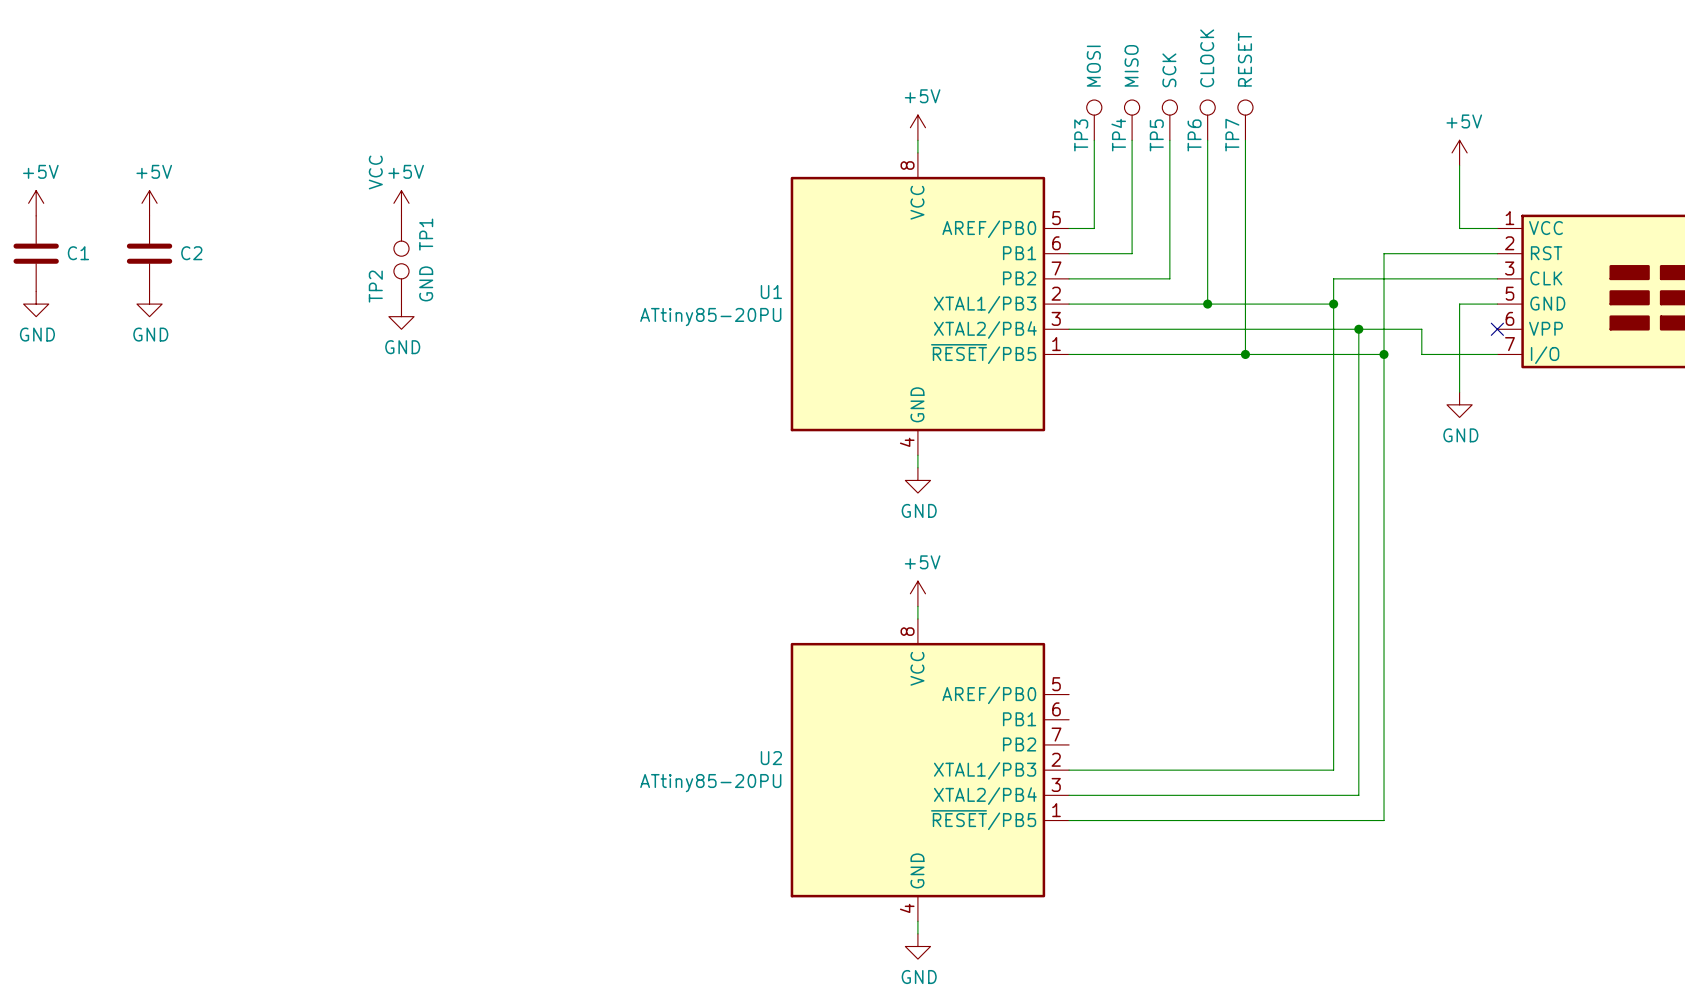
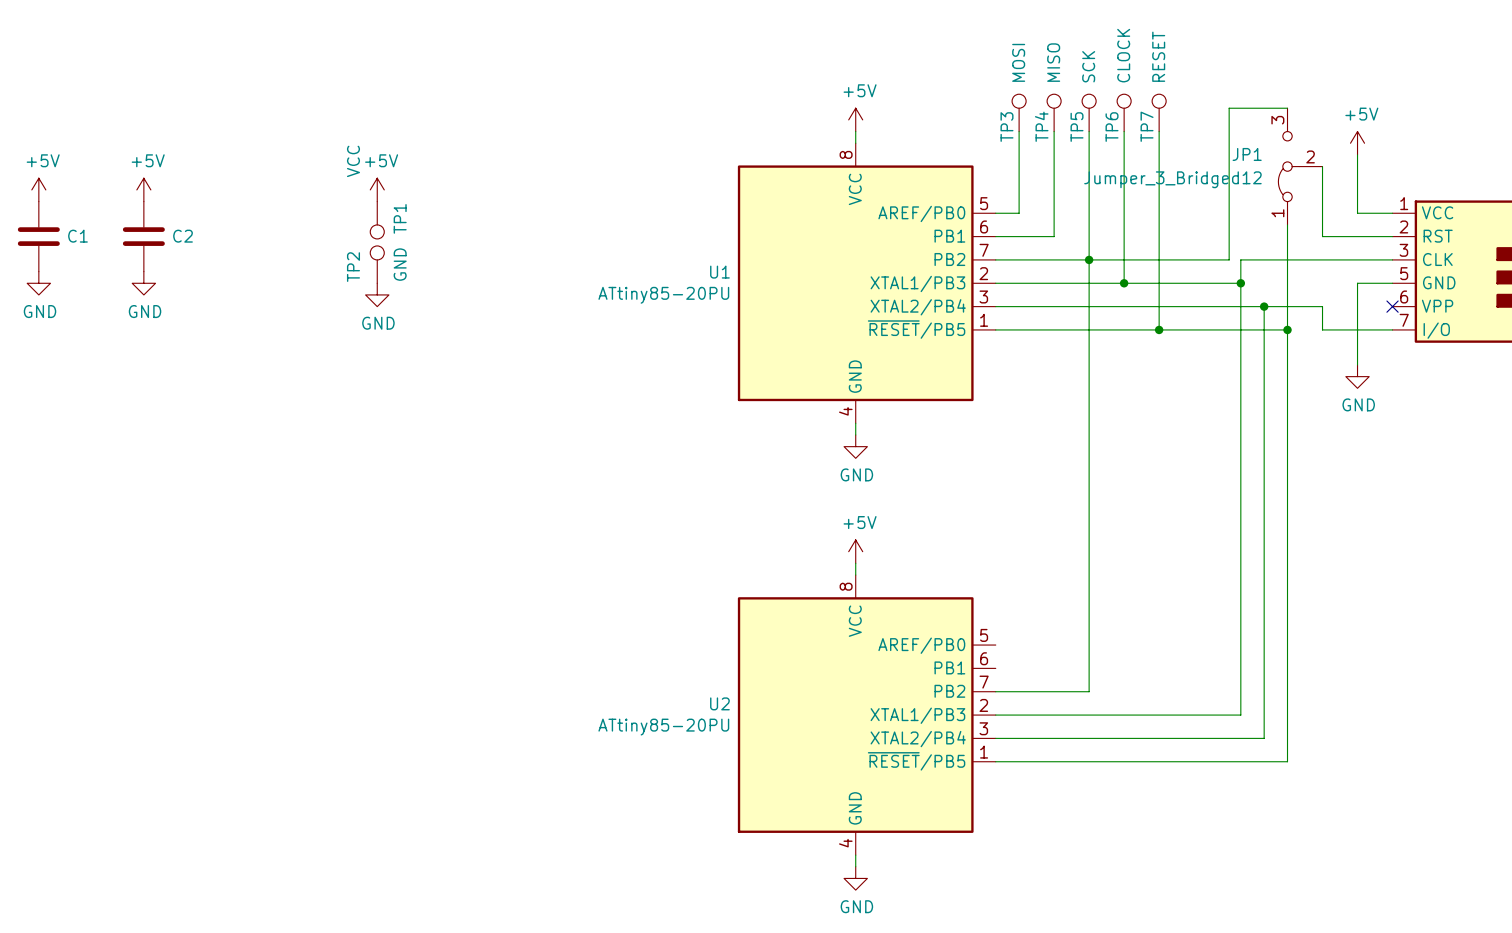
wire: none -> (1287, 108) (1229, 108) (1229, 259) (1089, 259) (1089, 691) (995, 691)
JP1: none -> Jumper_3_Bridged12 (1300, 166)
wire: none -> (1322, 166) (1322, 236)
wire: (1384, 253) (1421, 253) -> (1287, 236) (1287, 224)
junction: none -> (1089, 259)

